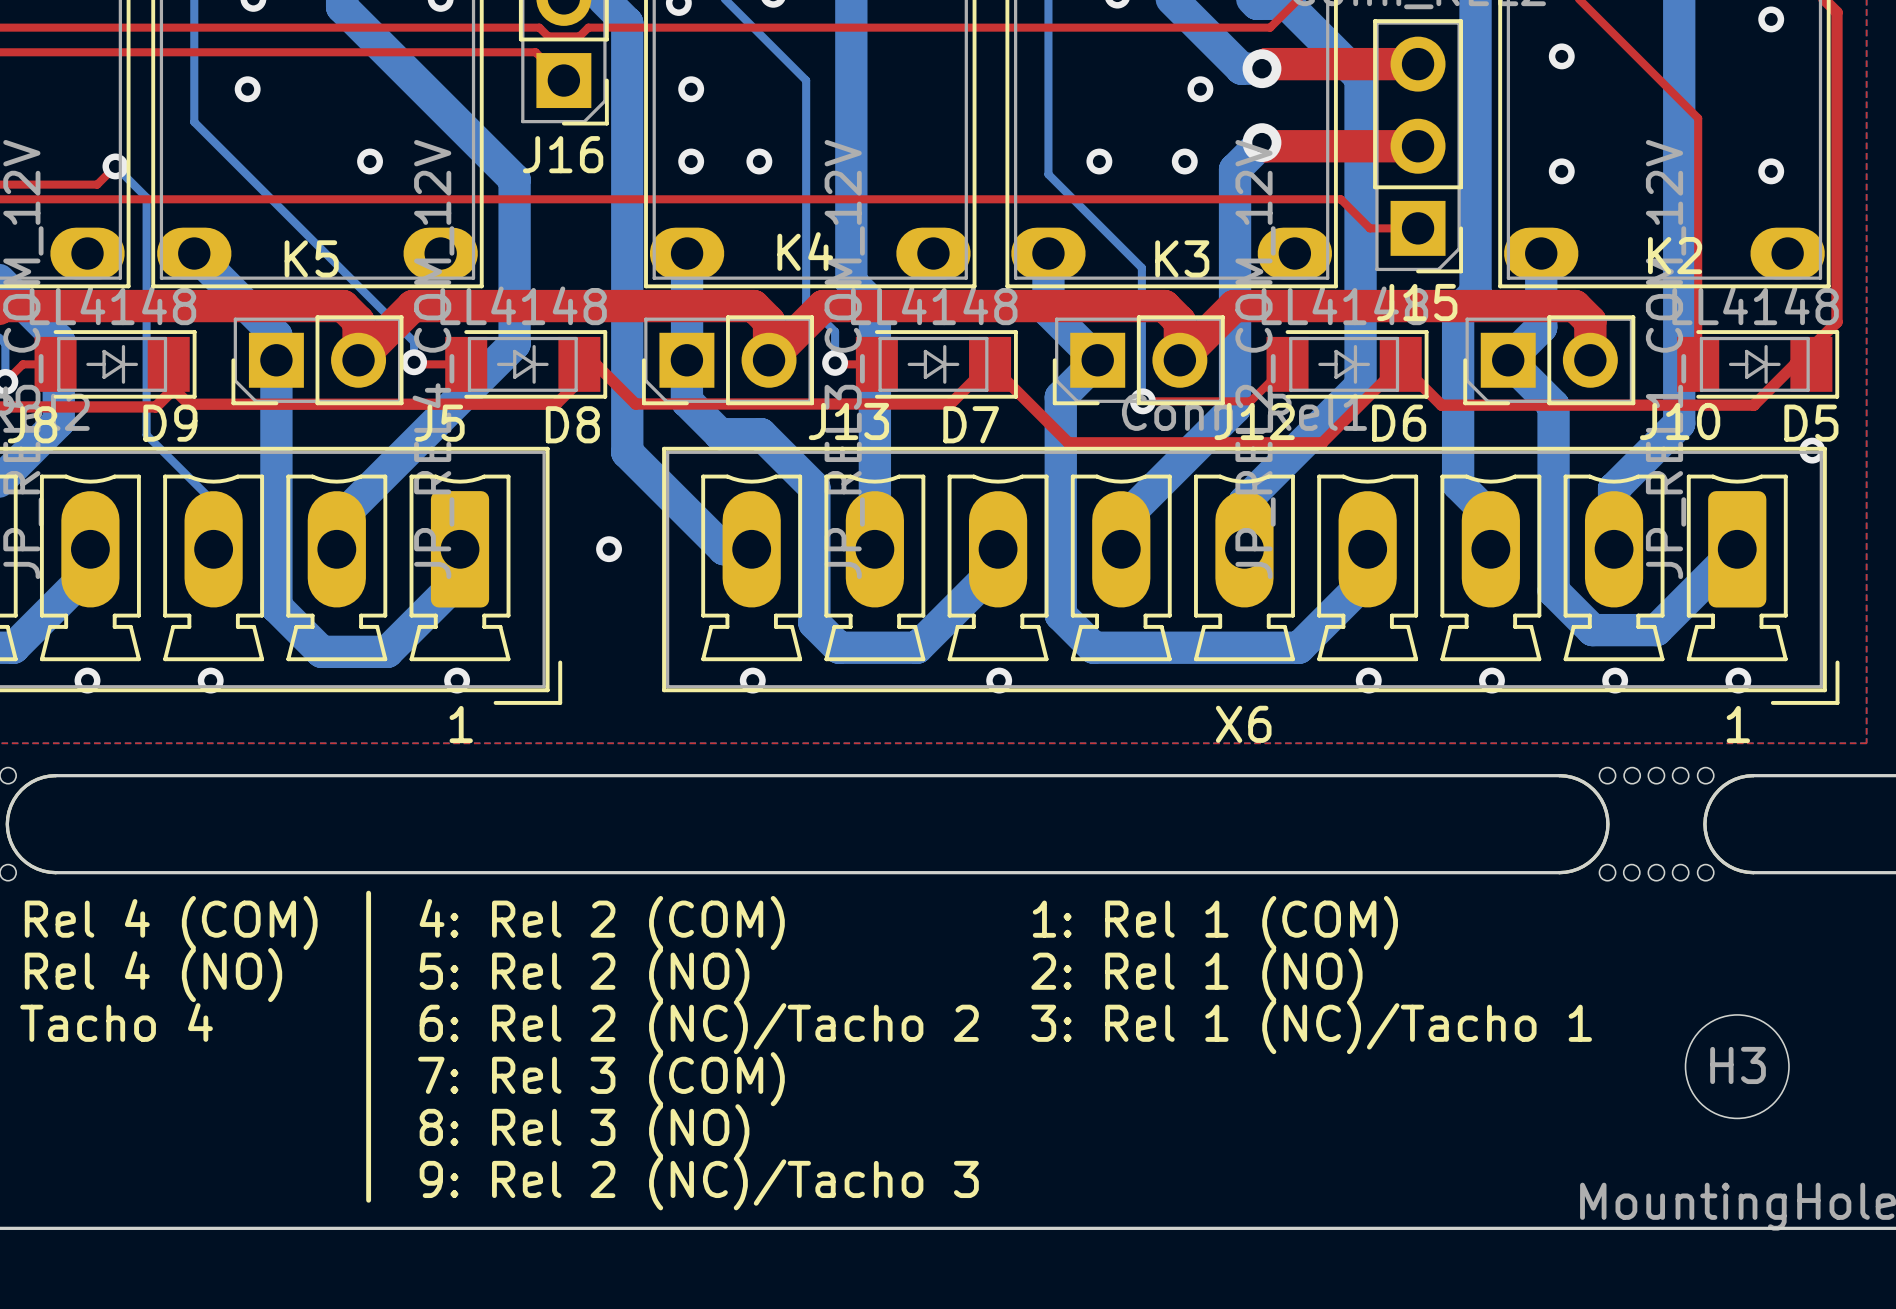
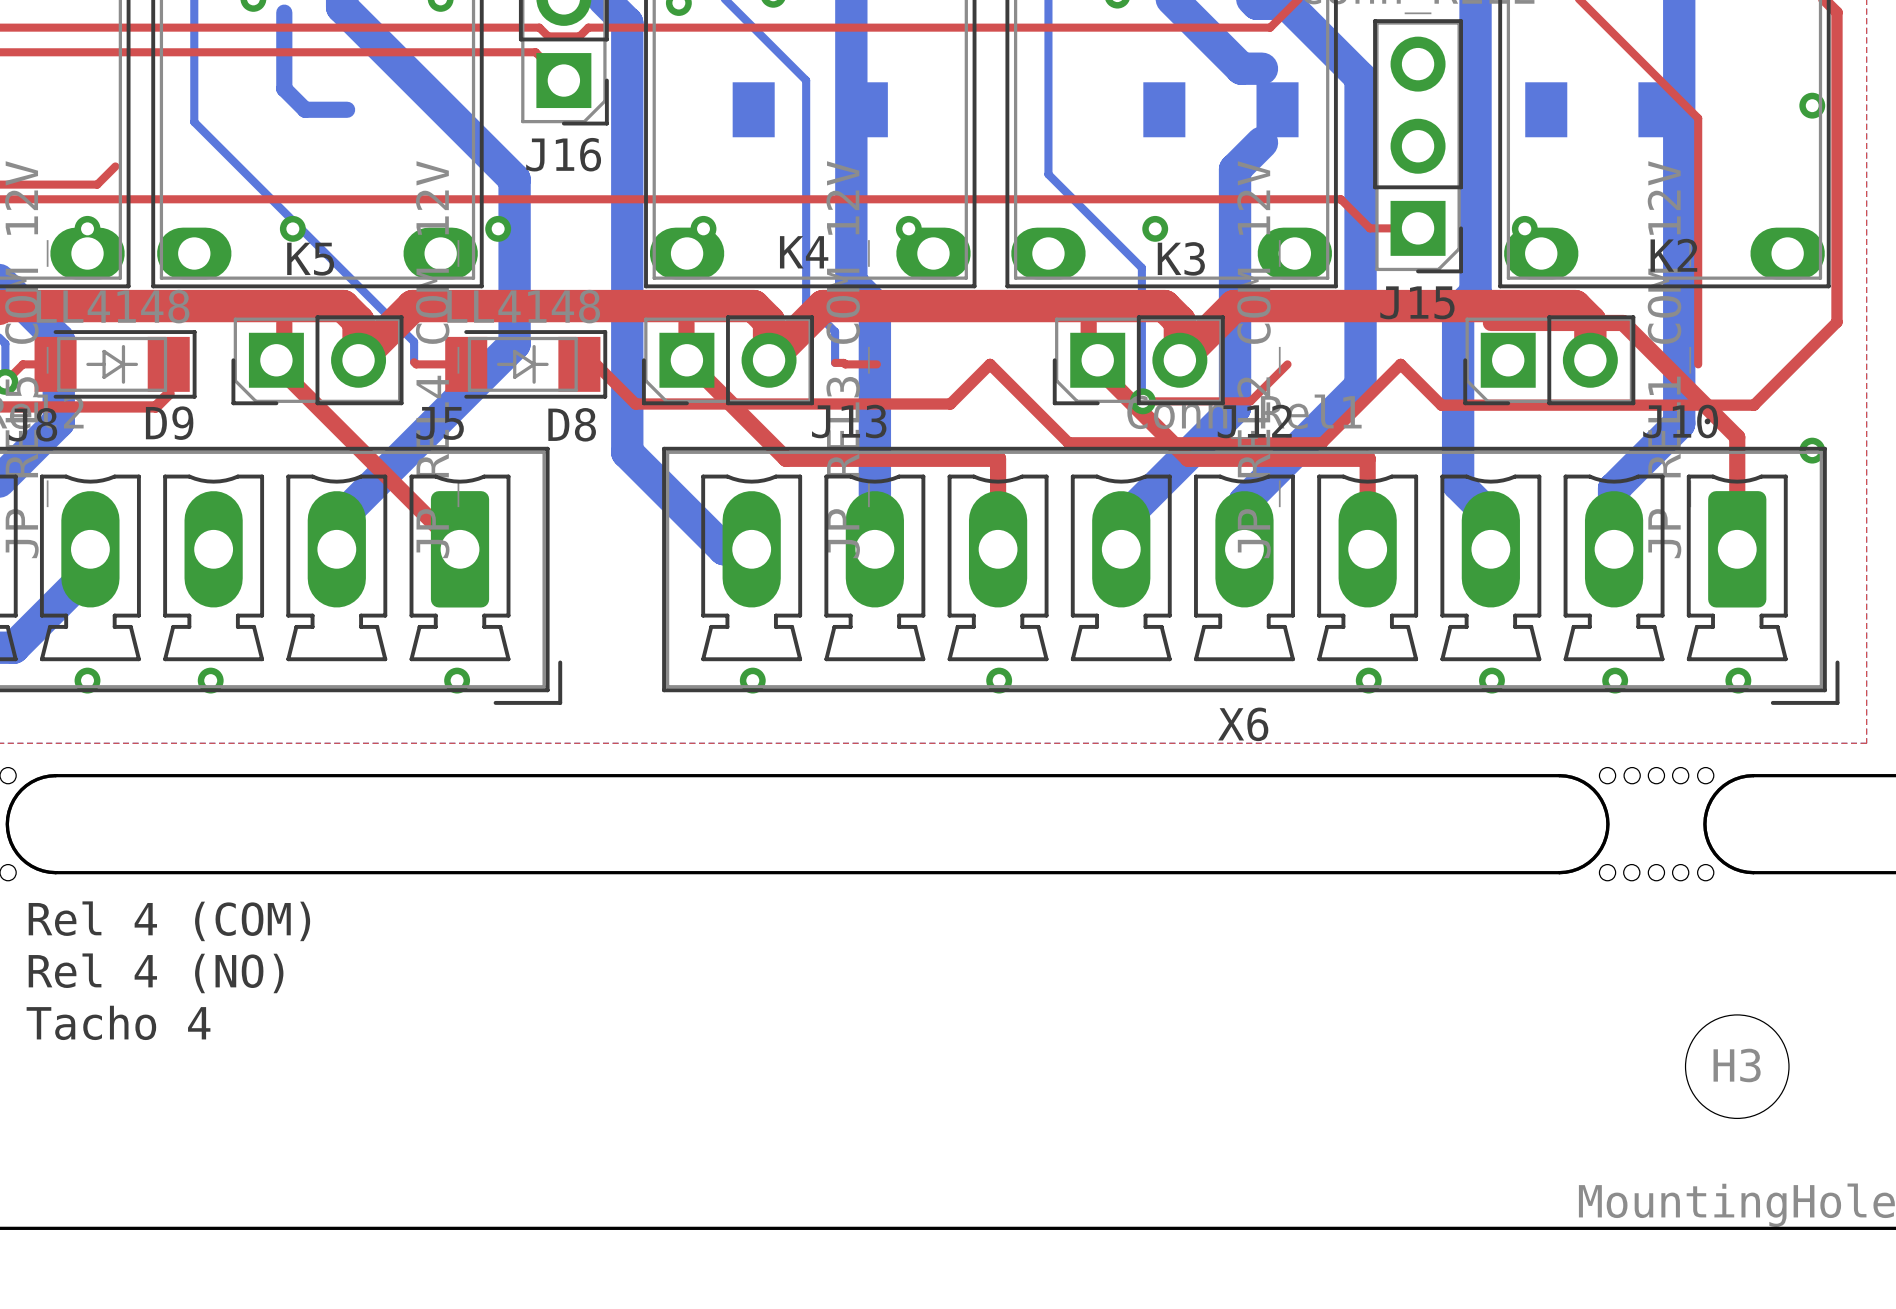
bottom track: none -> (284, 12) (284, 88) (305, 109) (347, 109)
via: (1771, 19) -> none
via: (1561, 56) -> none
top track: (1418, 64) (1266, 64) (1261, 68) -> none
via: (1261, 68) -> none
via: (247, 89) -> none
via: (691, 89) -> none
via: (1200, 89) -> none
via: none -> (1812, 105)
top track: (1261, 142) (1265, 146) (1418, 146) -> none
via: (1261, 142) -> none
via: (370, 161) -> none
via: (691, 161) -> none
via: (759, 161) -> none
via: (1099, 161) -> none
via: (1184, 161) -> none
bottom track: (115, 166) (146, 197) (146, 435) (213, 502) (213, 549) -> none
via position: (115, 166) -> (87, 228)
via position: (1561, 171) -> (1524, 228)
via: (1771, 171) -> none
via: none -> (292, 228)
via: none -> (498, 228)
via: none -> (703, 228)
via: none -> (908, 228)
via: none -> (1155, 228)
bottom track: (194, 253) (276, 335) (276, 606) (321, 651) (387, 651) (460, 579) (460, 549) -> none
bottom track: (687, 253) (686, 401) (719, 434) (760, 434) (814, 487) (814, 623) (839, 647) (917, 647) (998, 566) (998, 549) -> none
bottom track: (1048, 253) (1048, 310) (1097, 360) (1060, 397) (1060, 614) (1093, 647) (1298, 647) (1367, 579) (1367, 549) -> none
bottom track: (1541, 253) (1541, 327) (1508, 360) (1553, 405) (1553, 591) (1592, 630) (1656, 630) (1737, 549) -> none
top track: none -> (284, 322) (284, 373) (460, 549)
top track: none -> (686, 322) (686, 359) (785, 458) (998, 458) (998, 549)
top track: none -> (1088, 322) (1088, 359) (1188, 458) (1367, 458) (1367, 549)
top track: none -> (1490, 322) (1623, 322) (1737, 437) (1737, 549)
via: (414, 362) -> none
via: (835, 362) -> none
top track: (579, 364) (595, 364) (556, 404) (188, 404) (168, 384) -> none
D7 side: top (936, 364) -> bottom (810, 109)
D6 side: top (1347, 364) -> bottom (1220, 109)
D5 side: top (1758, 364) -> bottom (1602, 109)
via: (609, 549) -> none
text: 1 (461, 724) -> none
text: 1 (1738, 724) -> none
line: (368, 893) (368, 1200) -> none
text: 4: Rel 2 (COM) (602, 922) -> none
text: 1: Rel 1 (COM) (1215, 922) -> none
text: 5: Rel 2 (NO) (584, 975) -> none
text: 2: Rel 1 (NO) (1196, 975) -> none
text: 6: Rel 2 (NC)/Tacho 2 (699, 1027) -> none
text: 3: Rel 1 (NC)/Tacho 1 (1311, 1027) -> none
text: 7: Rel 3 (COM) (601, 1079) -> none
text: 8: Rel 3 (NO) (584, 1131) -> none
text: 9: Rel 2 (NC)/Tacho 3 (699, 1183) -> none

